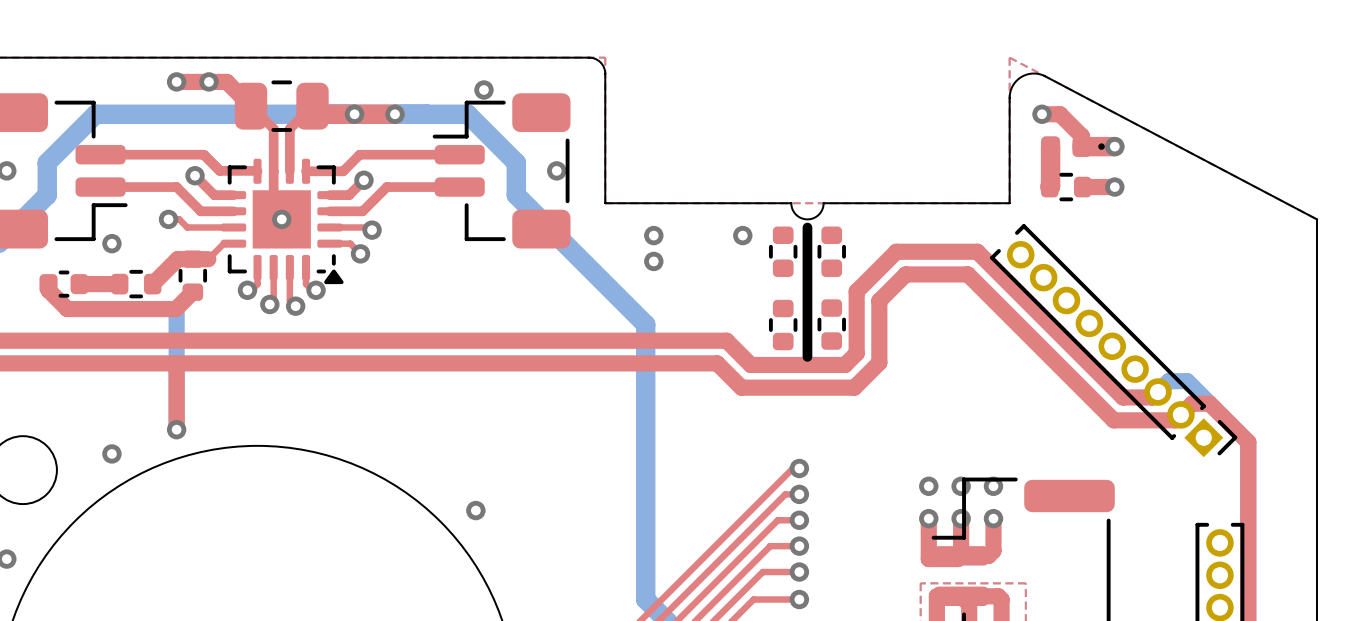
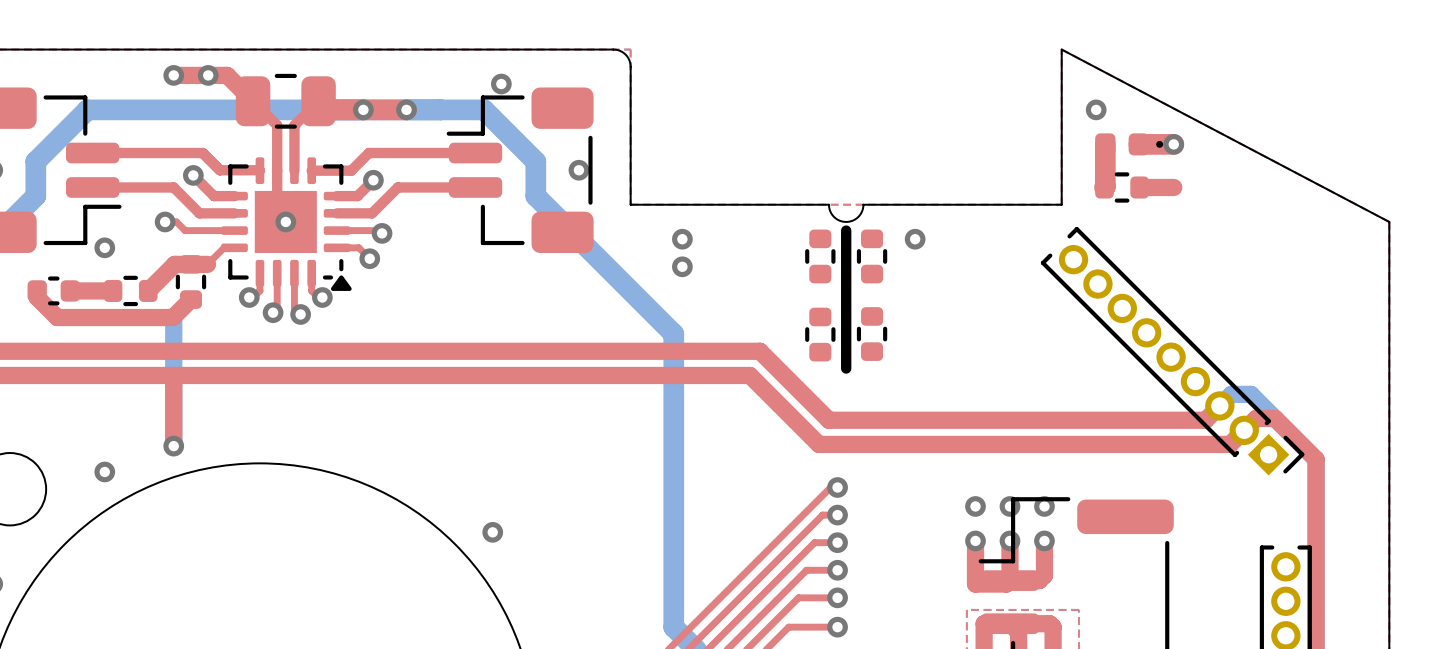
board edge: (1009, 98) (1011, 88) (1018, 79) (1029, 73) (1041, 74) (1316, 219) -> (1061, 92) (1061, 49) (1389, 221)
top track: (1042, 114) (1059, 114) (1081, 136) (1081, 146) -> none
via: (1114, 187) -> none
via: (742, 235) -> none
via: none -> (915, 239)
top track: (750, 364) (845, 364) (856, 353) (856, 291) (896, 251) (977, 251) (1123, 397) (1152, 397) -> (785, 377) (828, 420) (1205, 420) (1214, 411)
top track: (741, 387) (854, 387) (879, 362) (879, 300) (905, 274) (967, 274) (1113, 420) (1175, 420) -> (775, 401) (818, 444) (1230, 444) (1238, 436)

